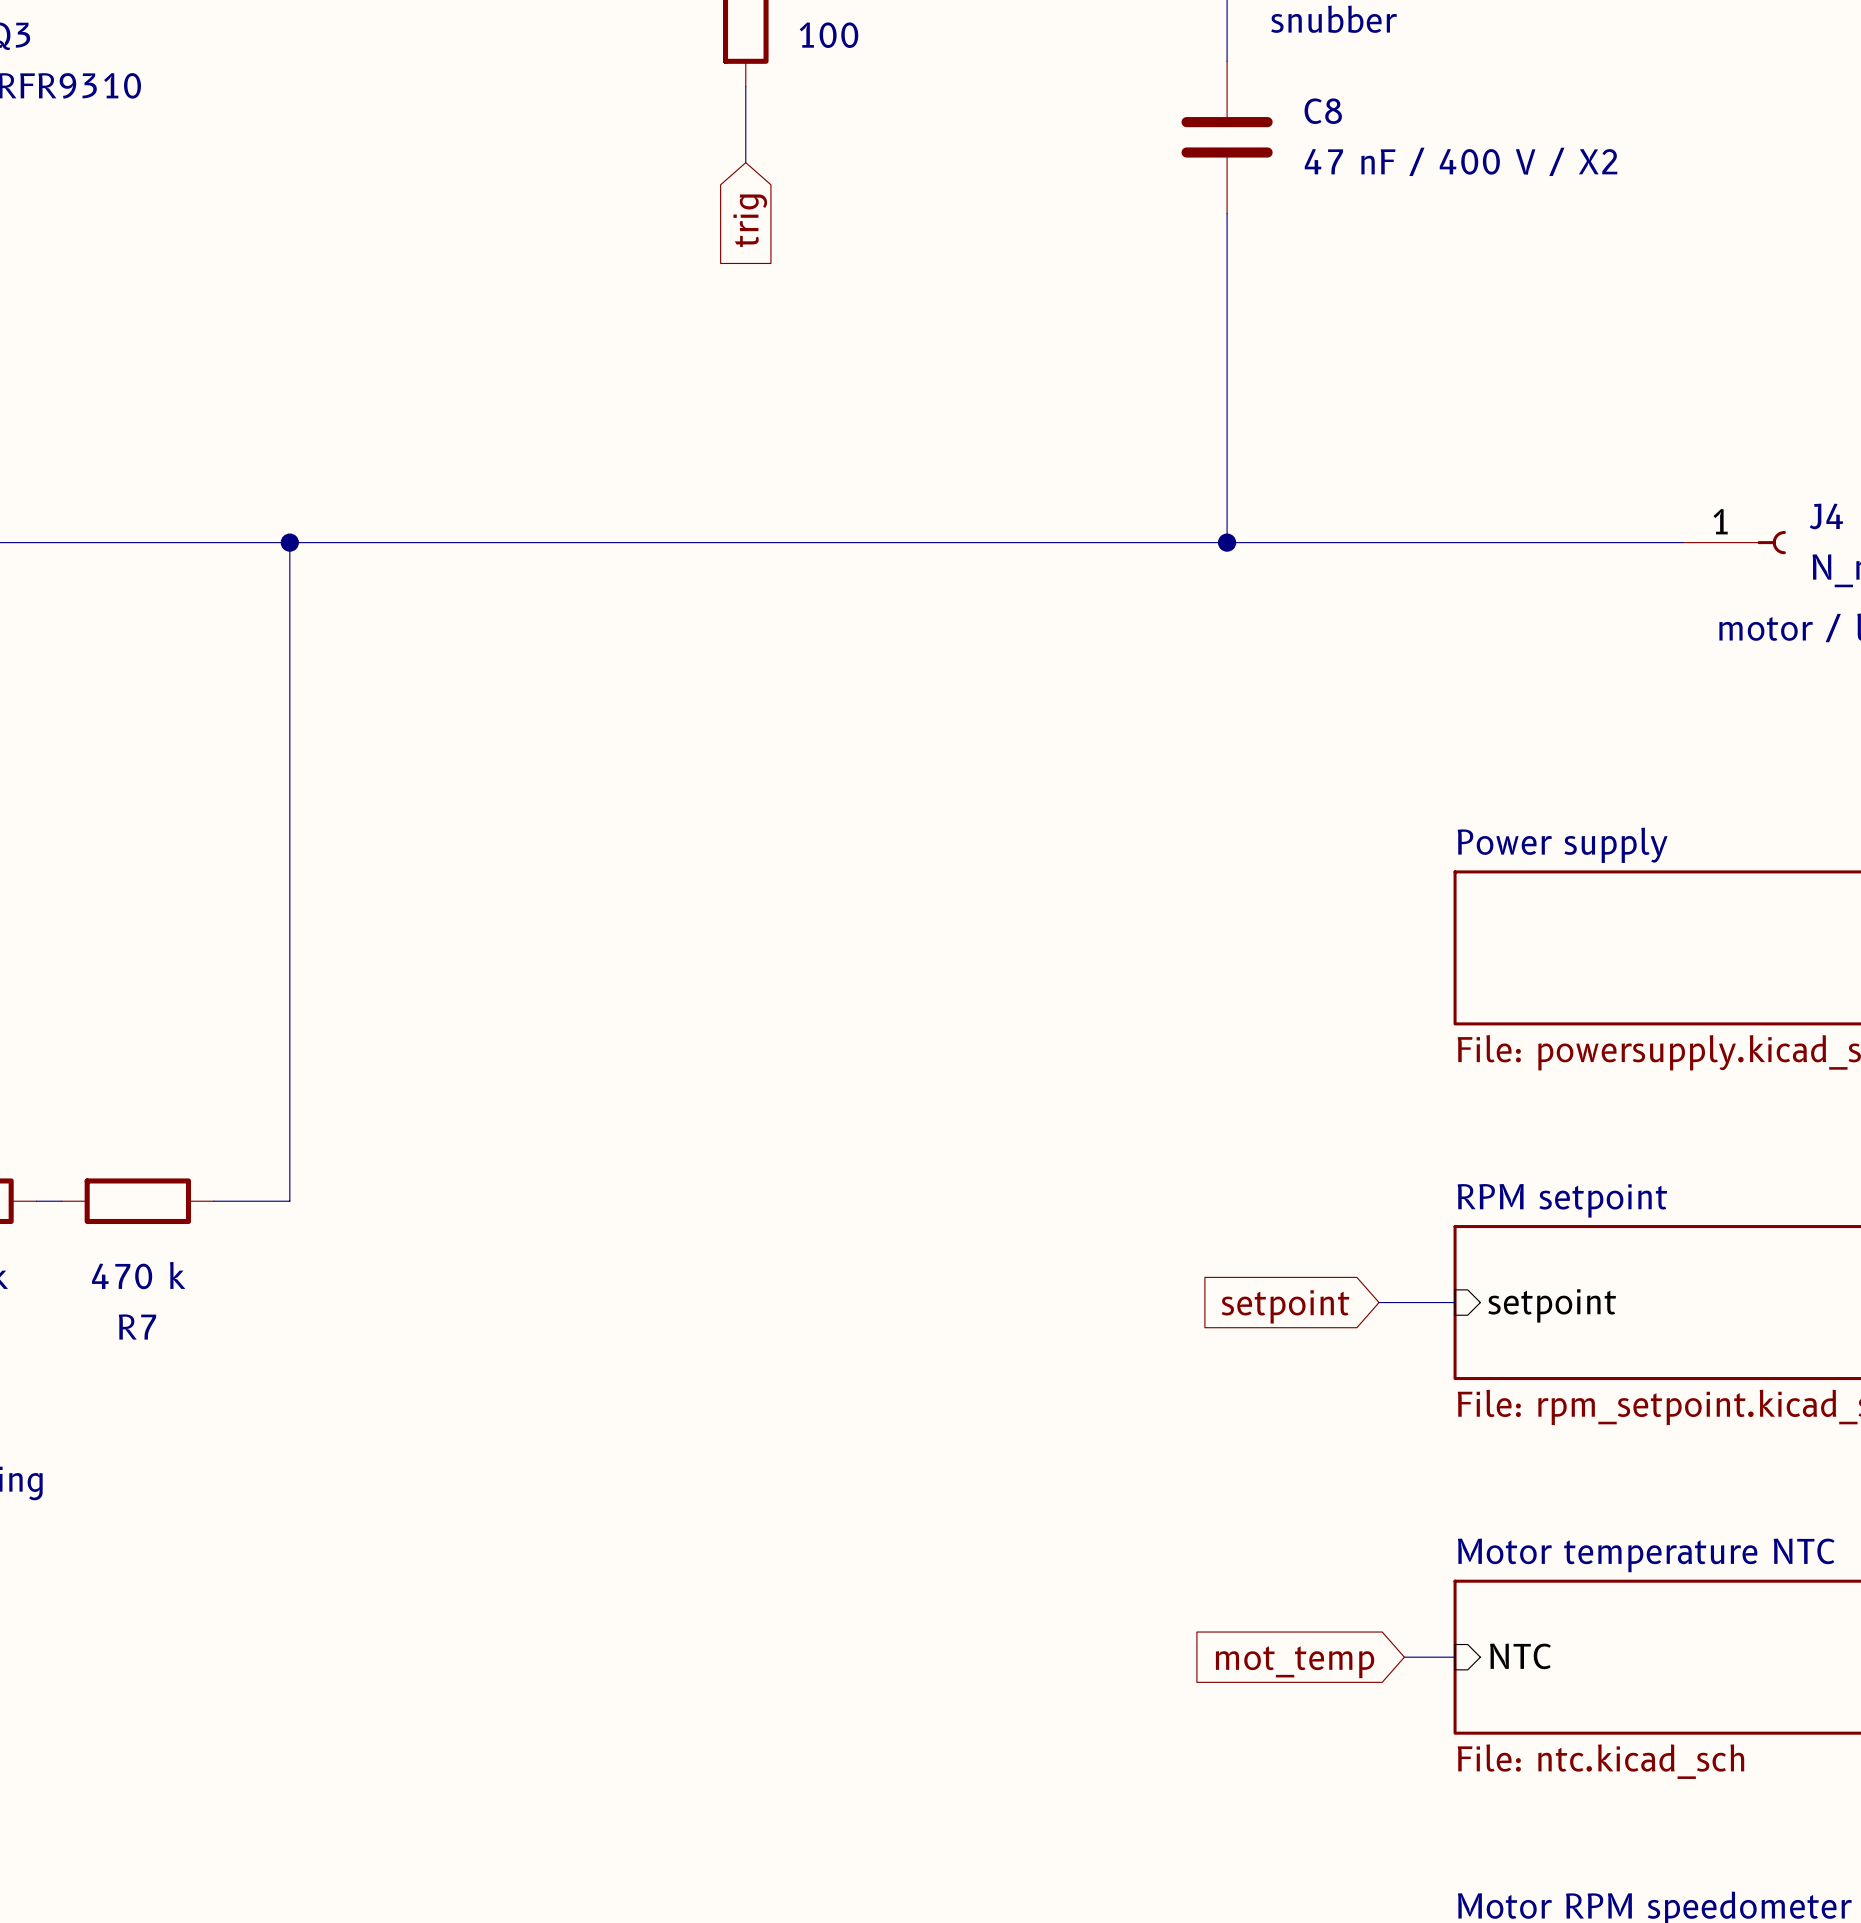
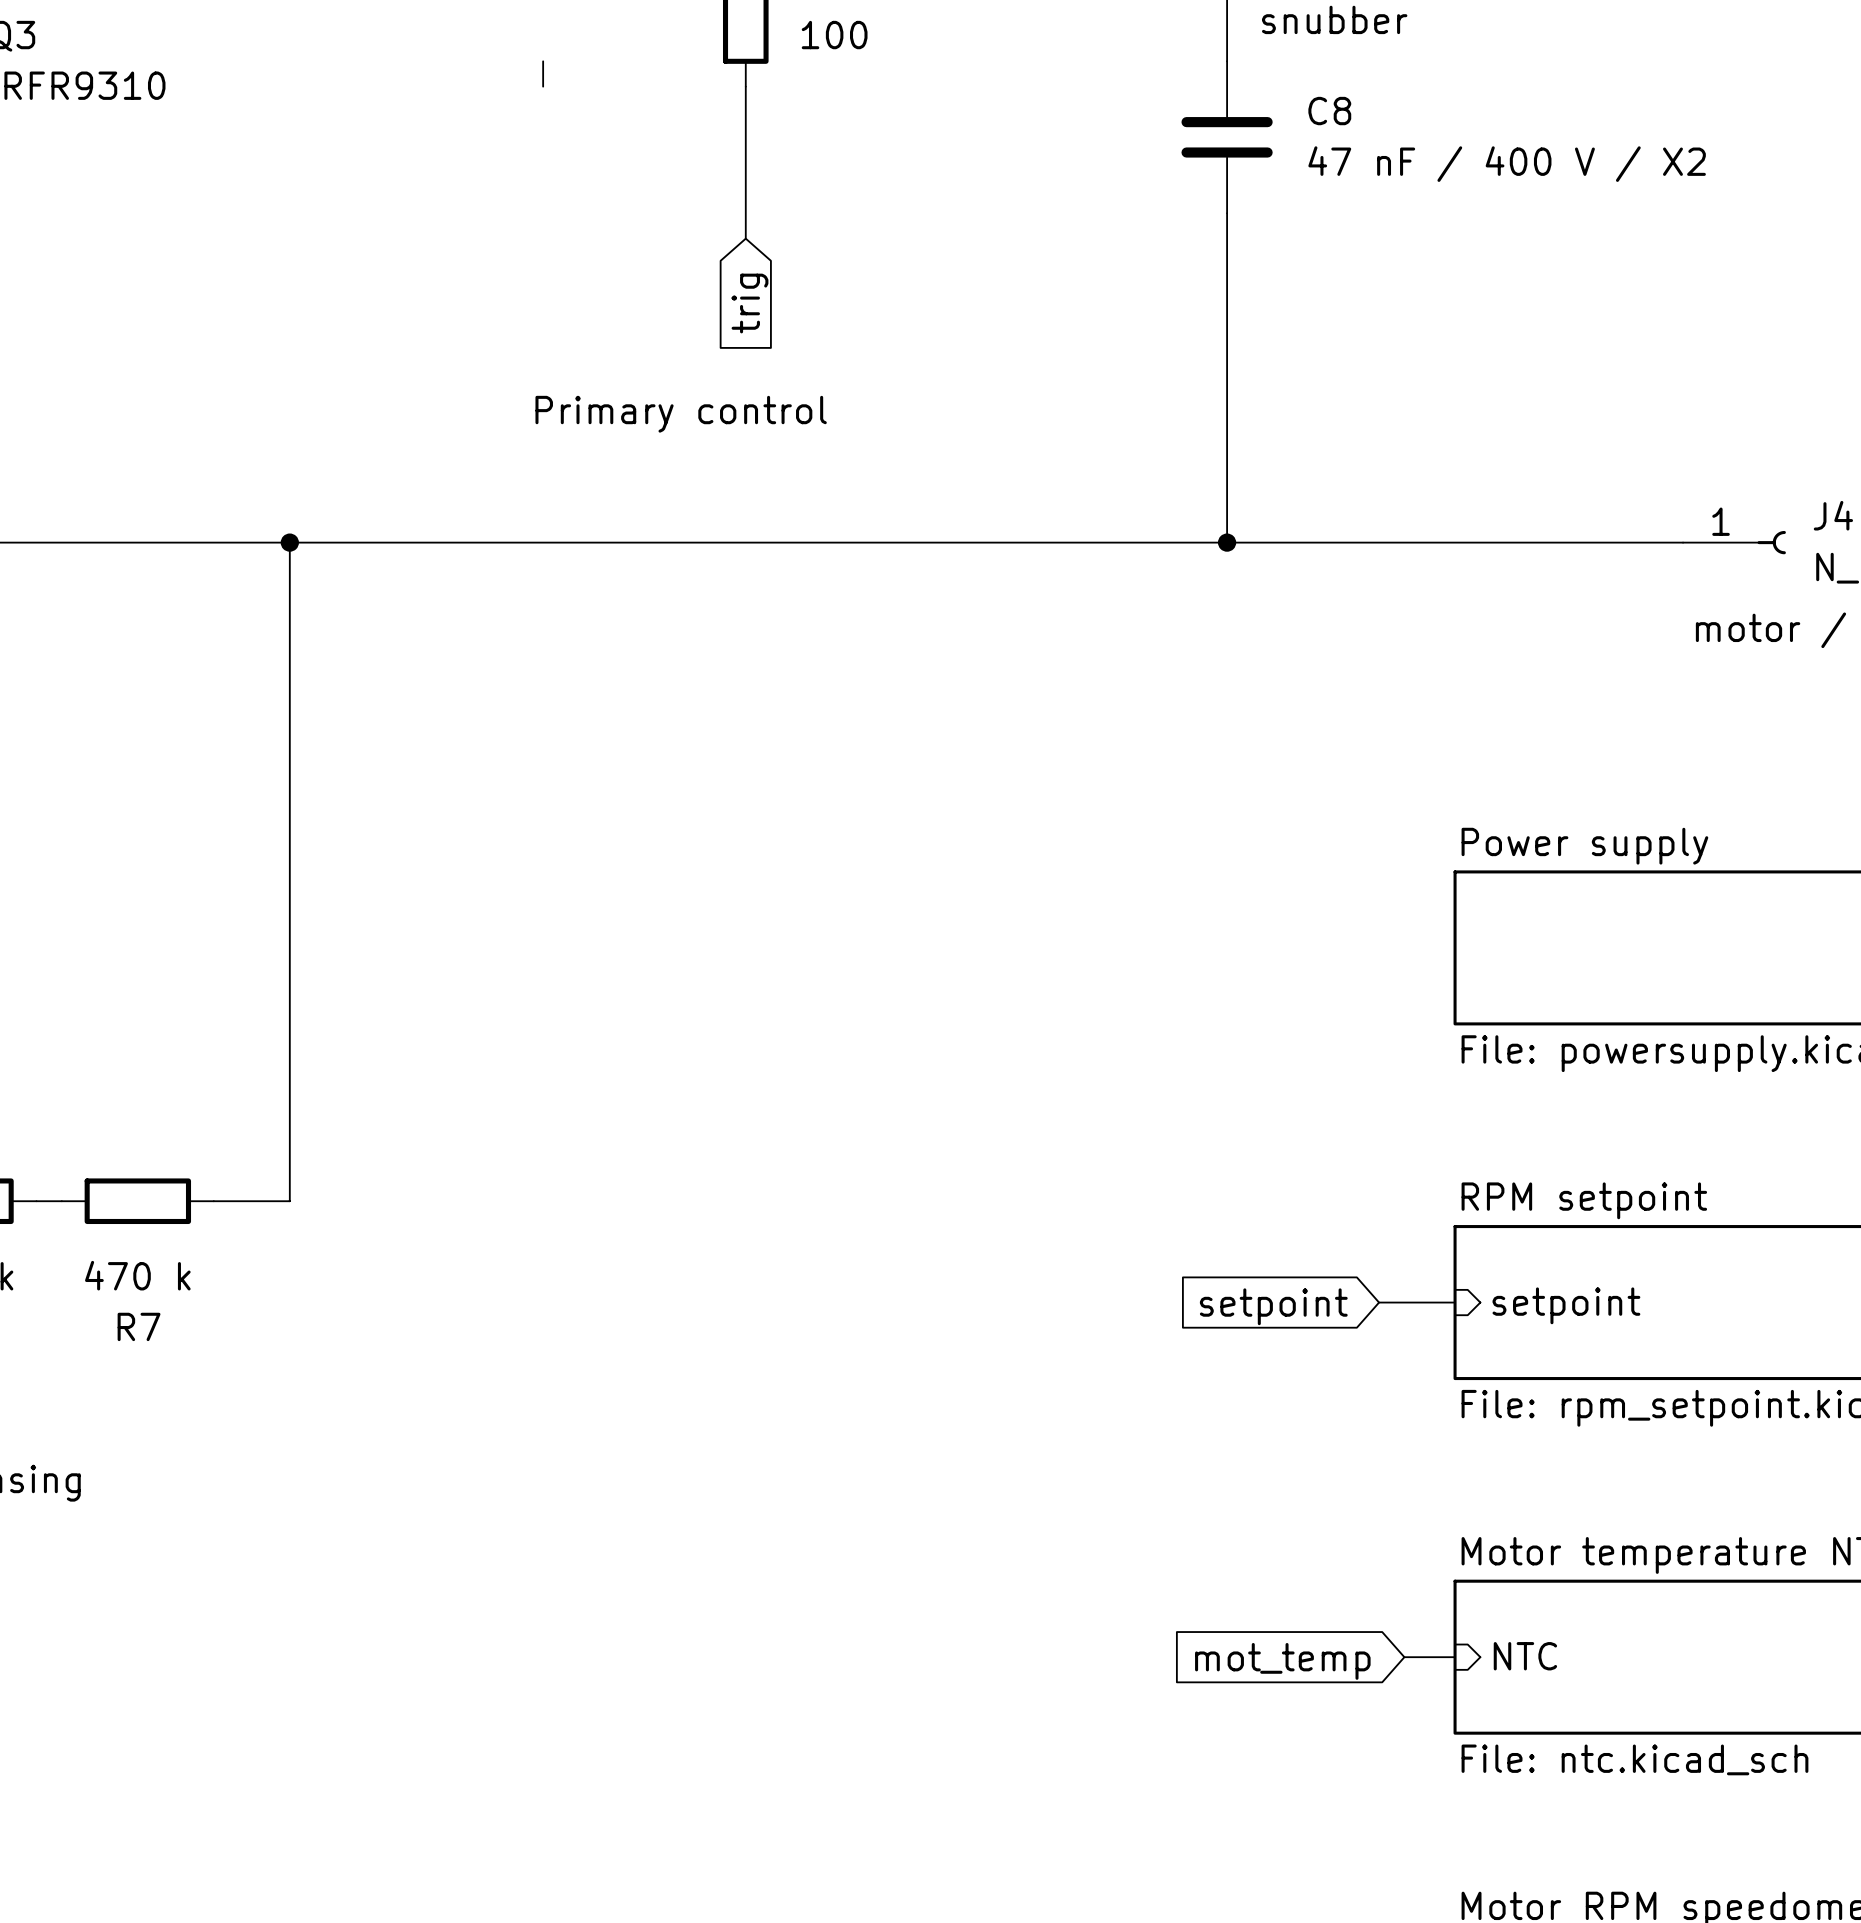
wire: none -> (543, 61) (543, 86)
wire: none -> (745, 162) (745, 238)
global label position: trig (750, 220) -> trig (750, 303)
text: none -> Primary control (681, 414)

